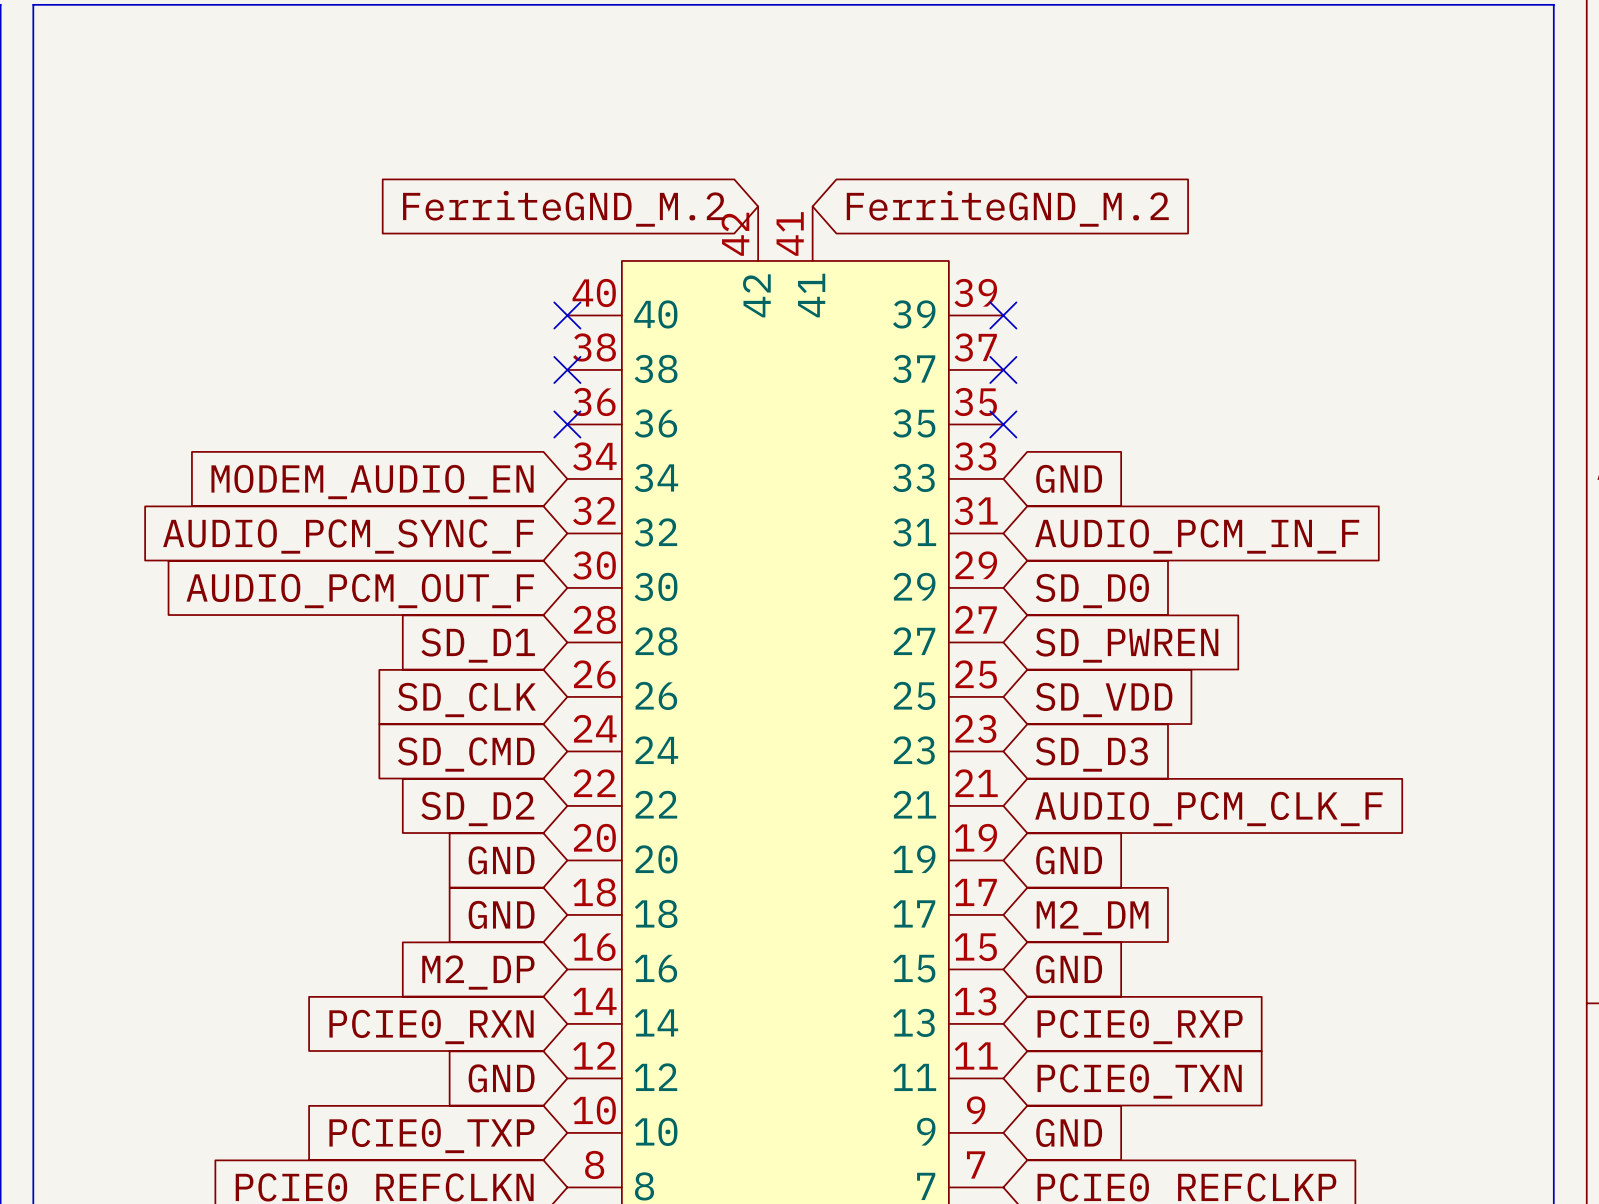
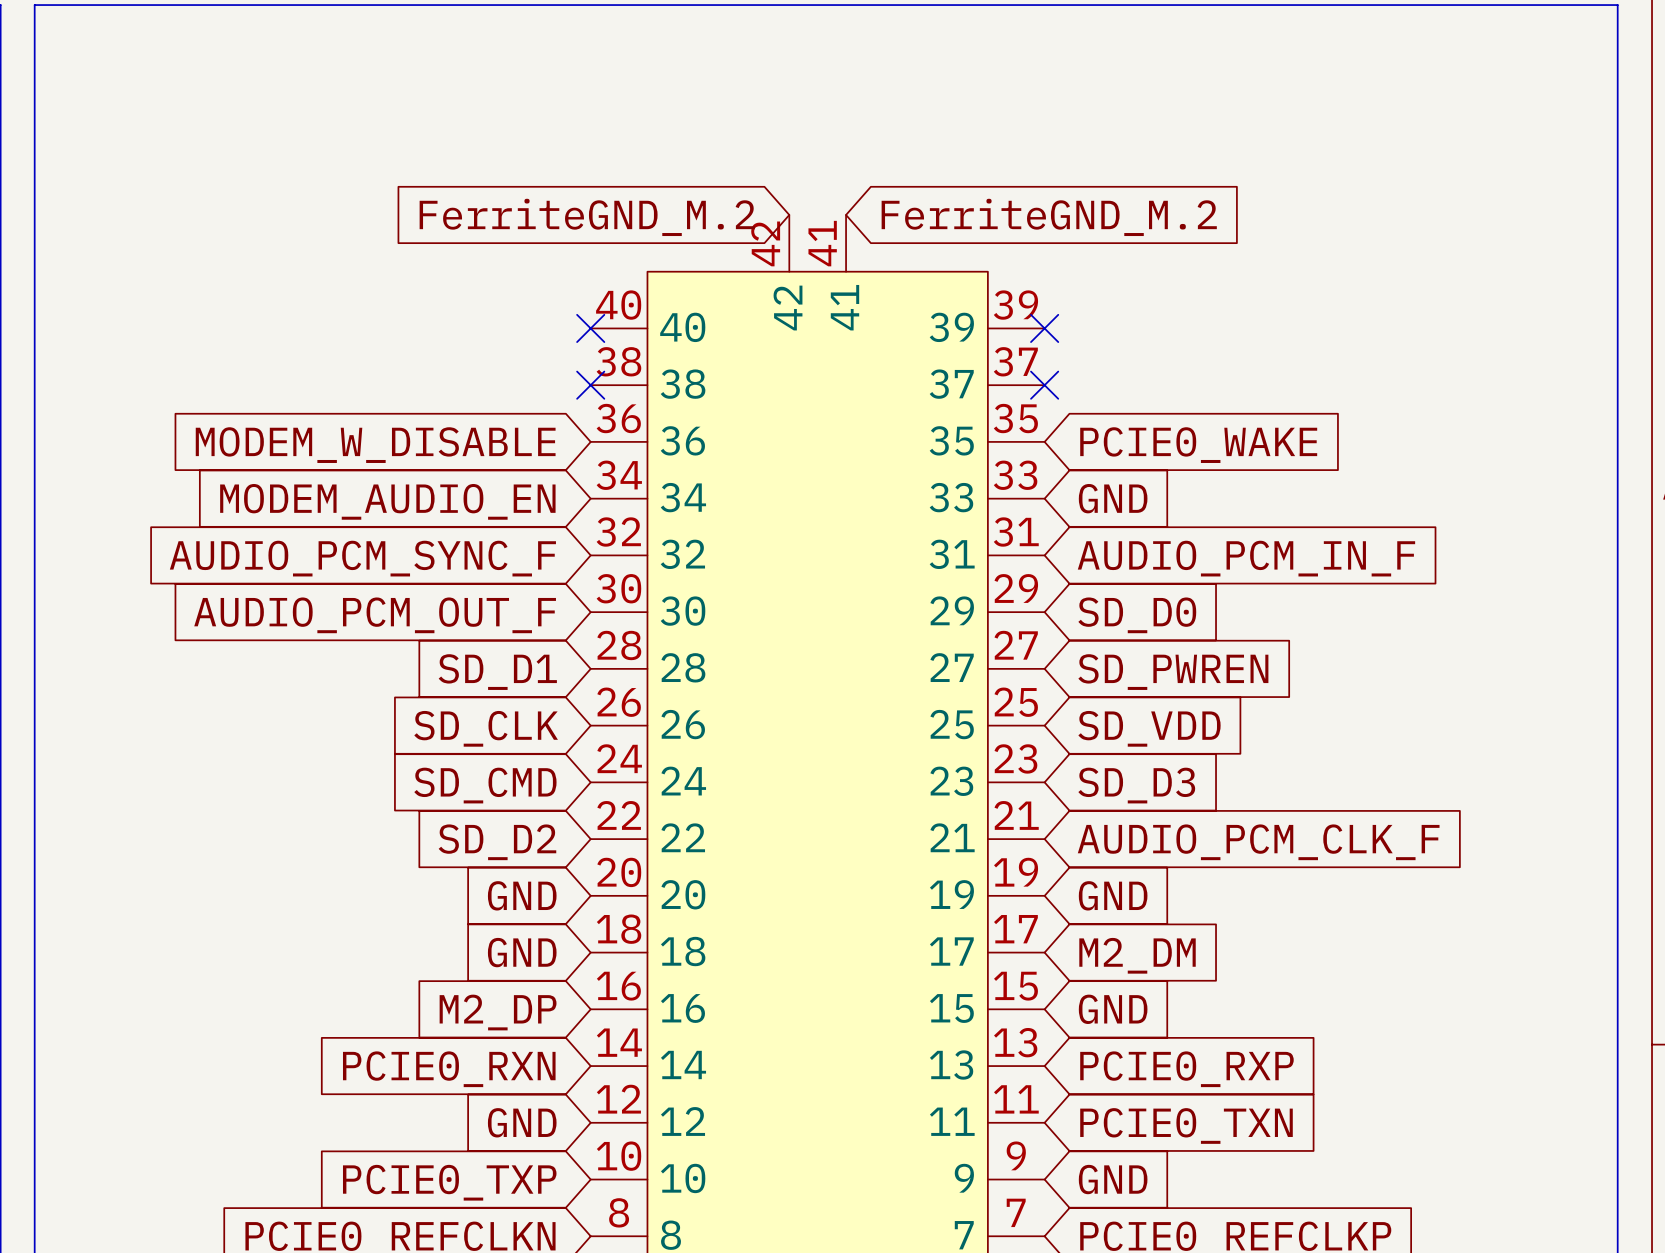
no-connect mark: (567, 424) -> none
no-connect mark: (1003, 424) -> none
global label: none -> MODEM_W_DISABLE (375, 445)
global label: none -> PCIE0_WAKE (1198, 445)

